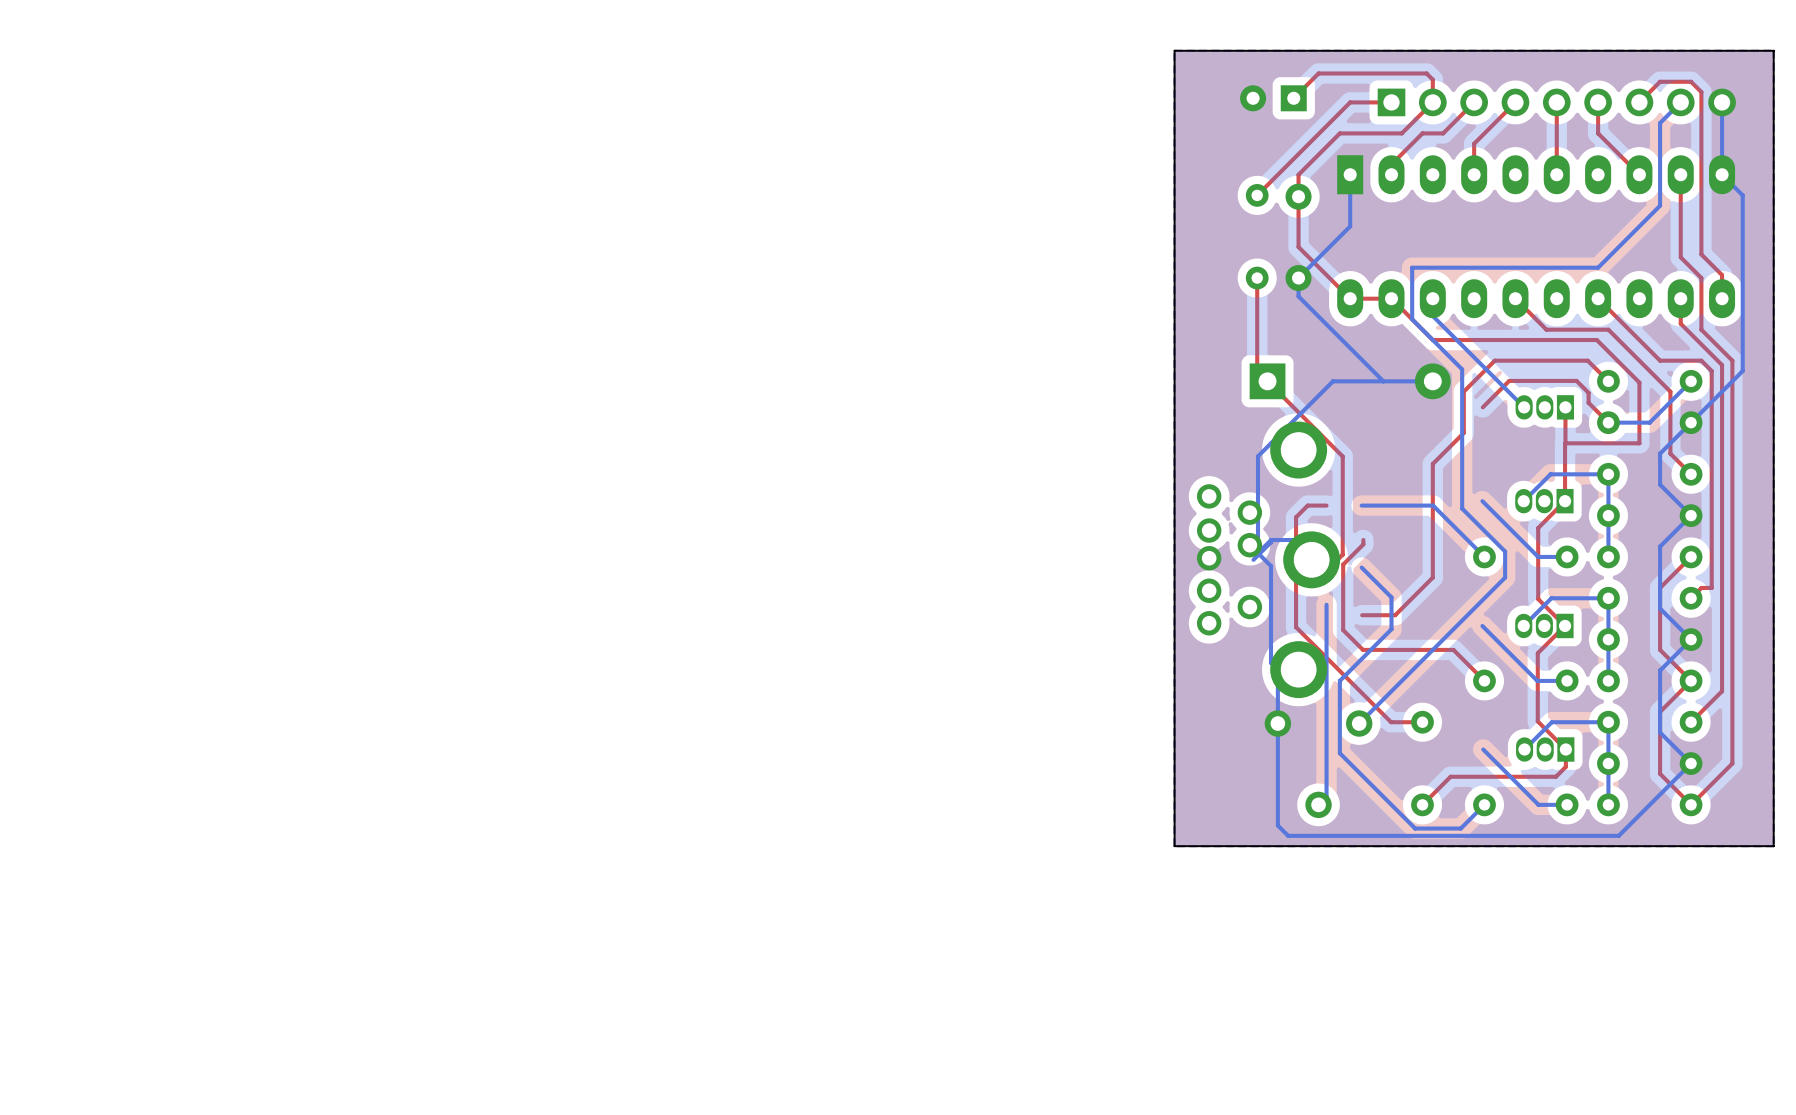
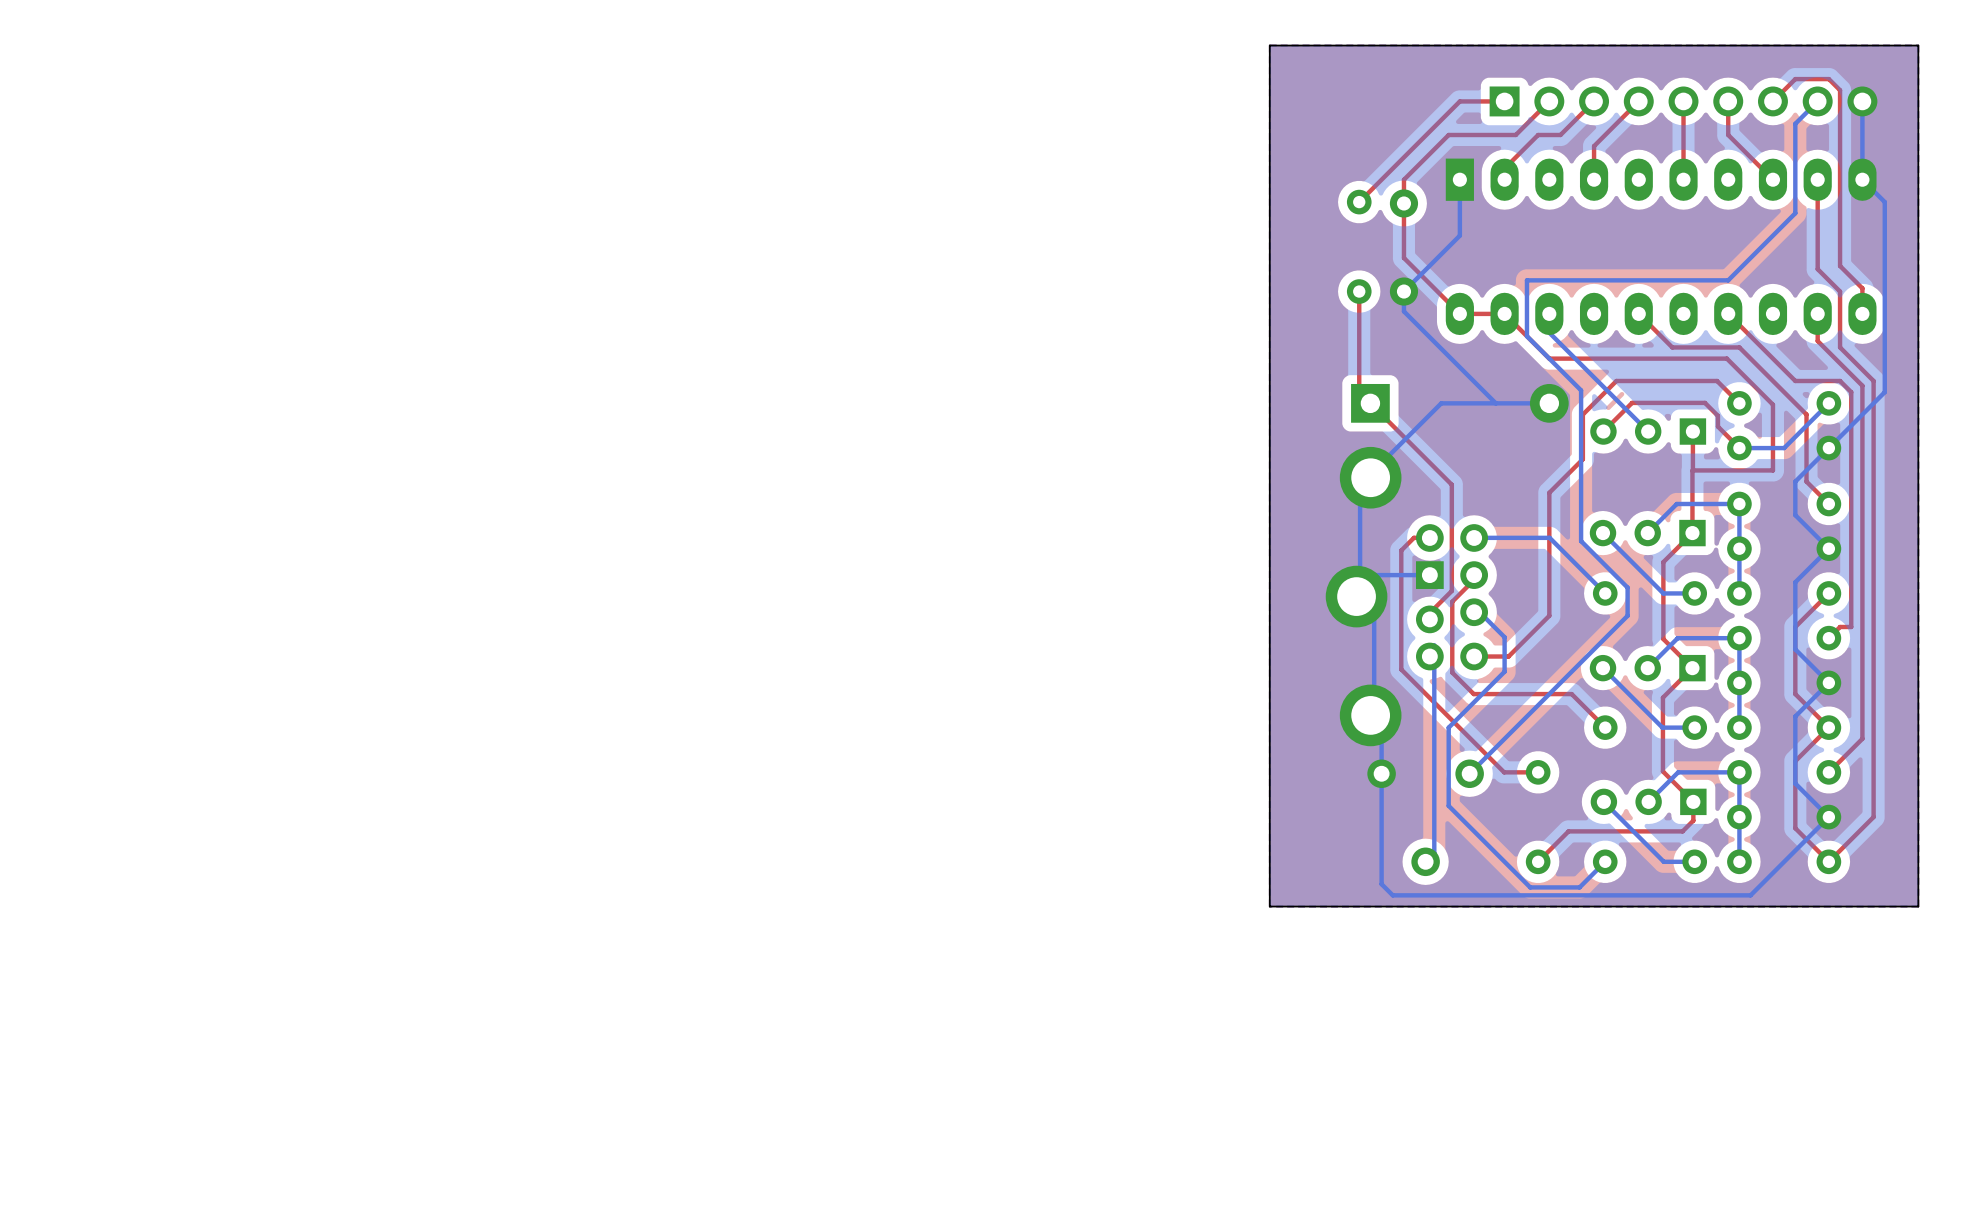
part: (1273, 98) -> none
top track: (1293, 98) (1318, 73) (1426, 73) (1432, 79) (1432, 102) -> none
part: none -> (1648, 431)
part: (1544, 407) -> none
part: none -> (1647, 533)
part: (1544, 501) -> none
part: (1268, 559) -> none
part: none -> (1406, 596)
part: none -> (1647, 668)
part: (1544, 625) -> none
part: none -> (1648, 801)
part: (1545, 749) -> none

